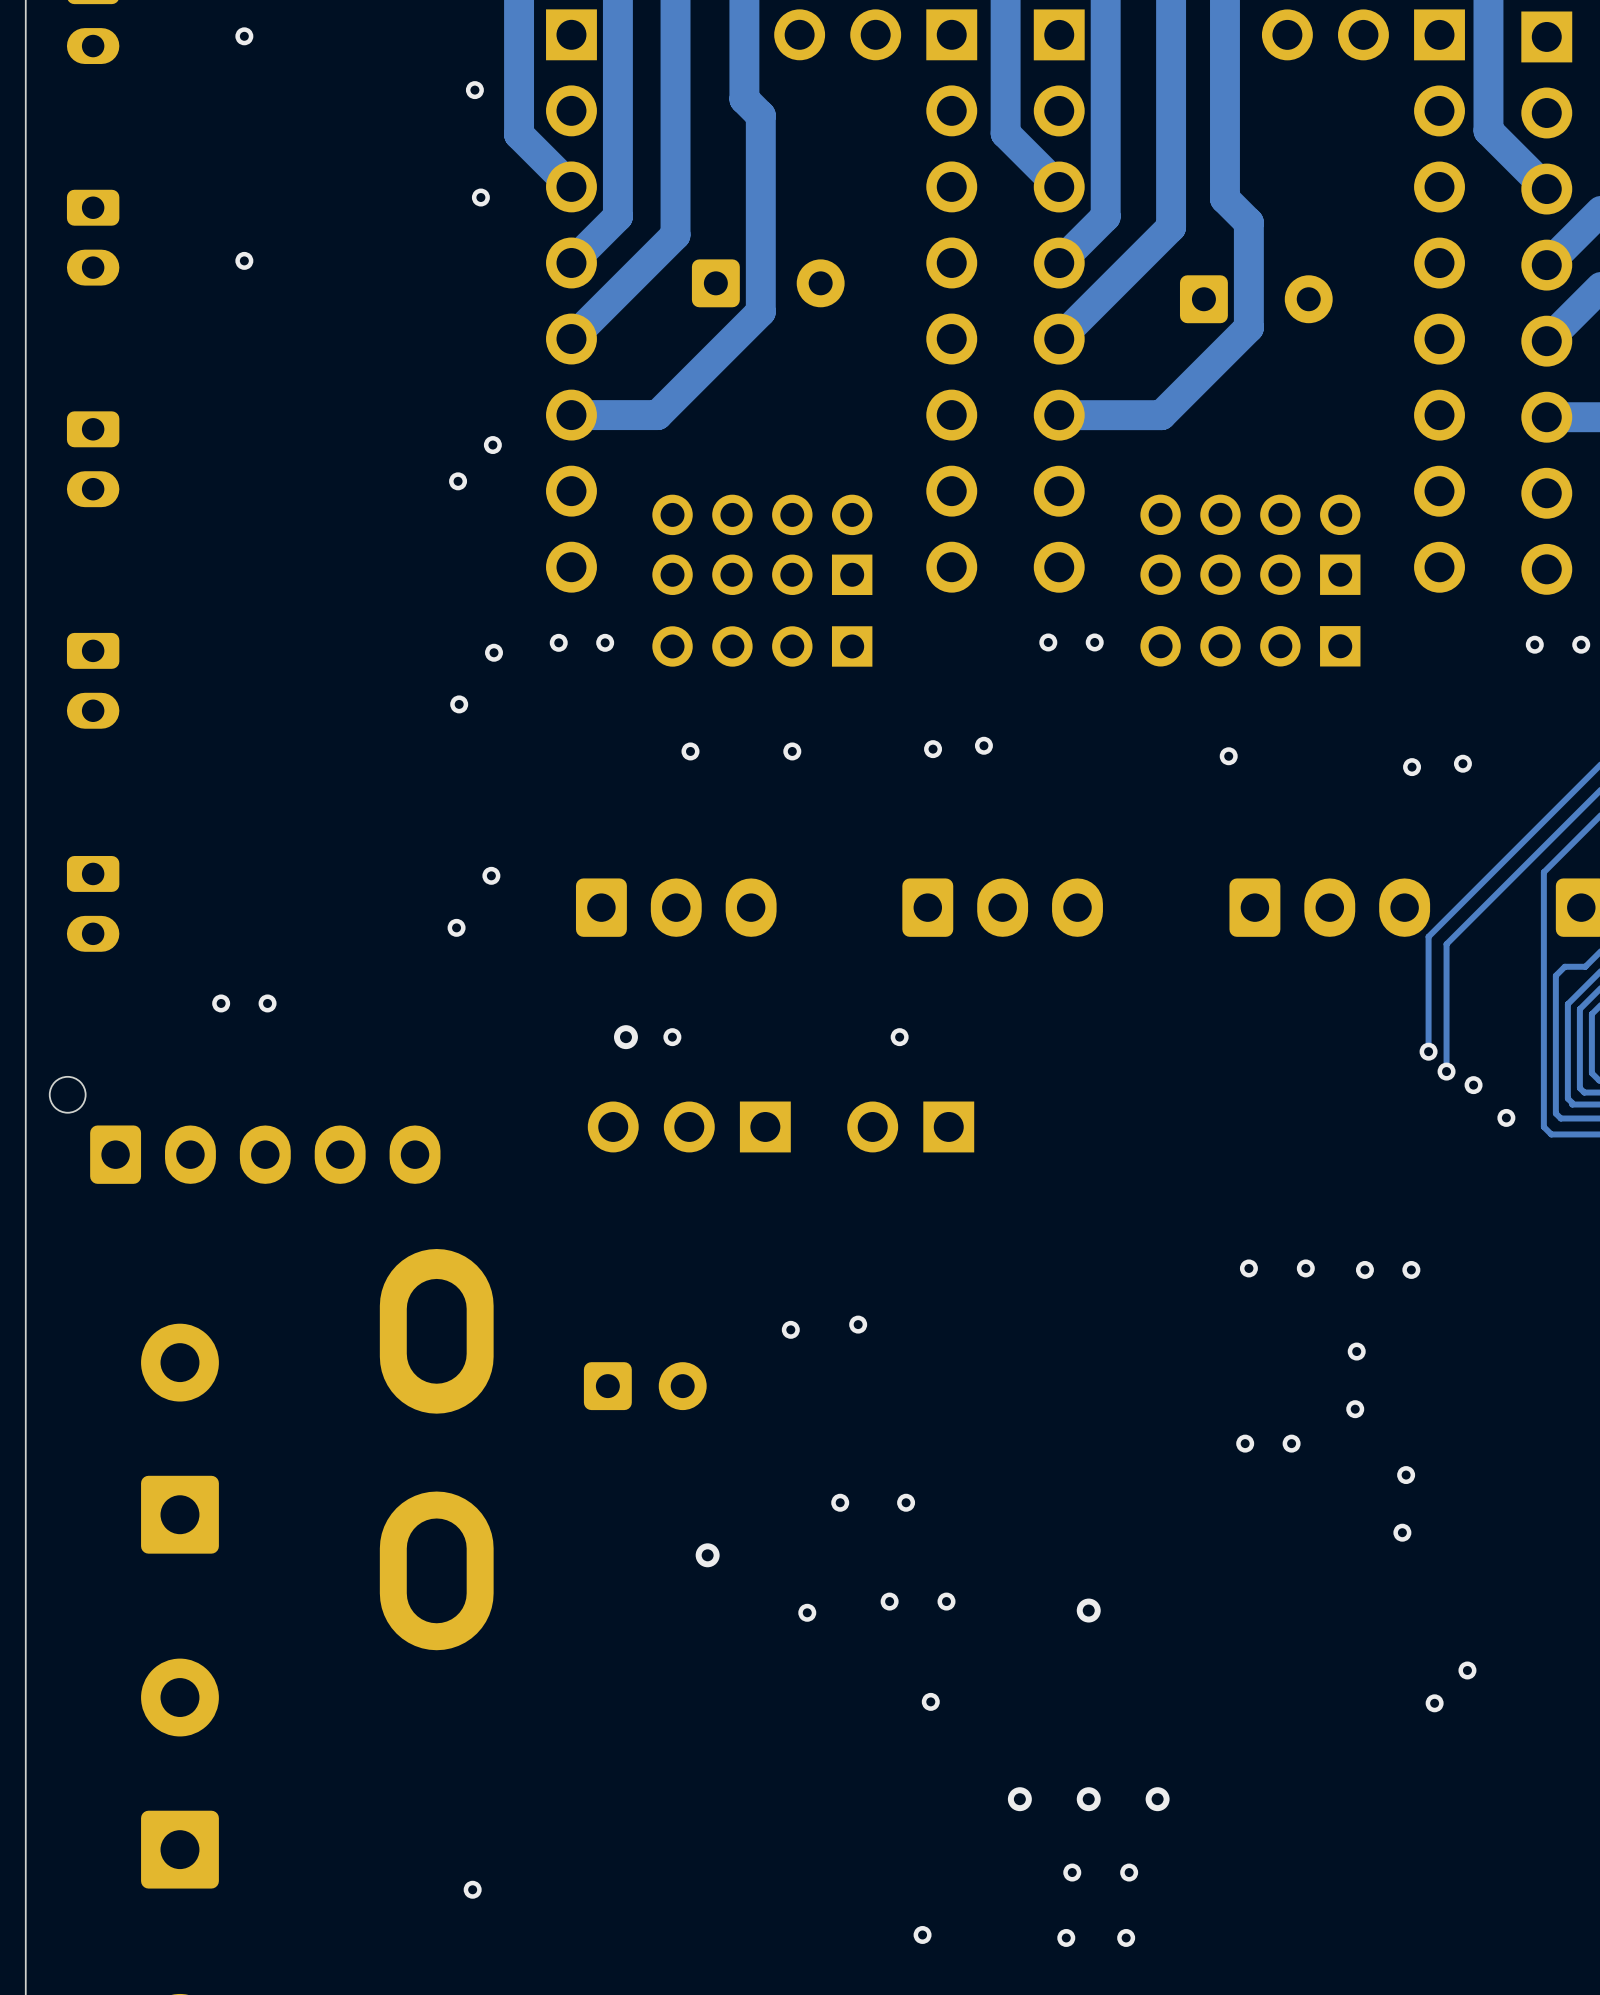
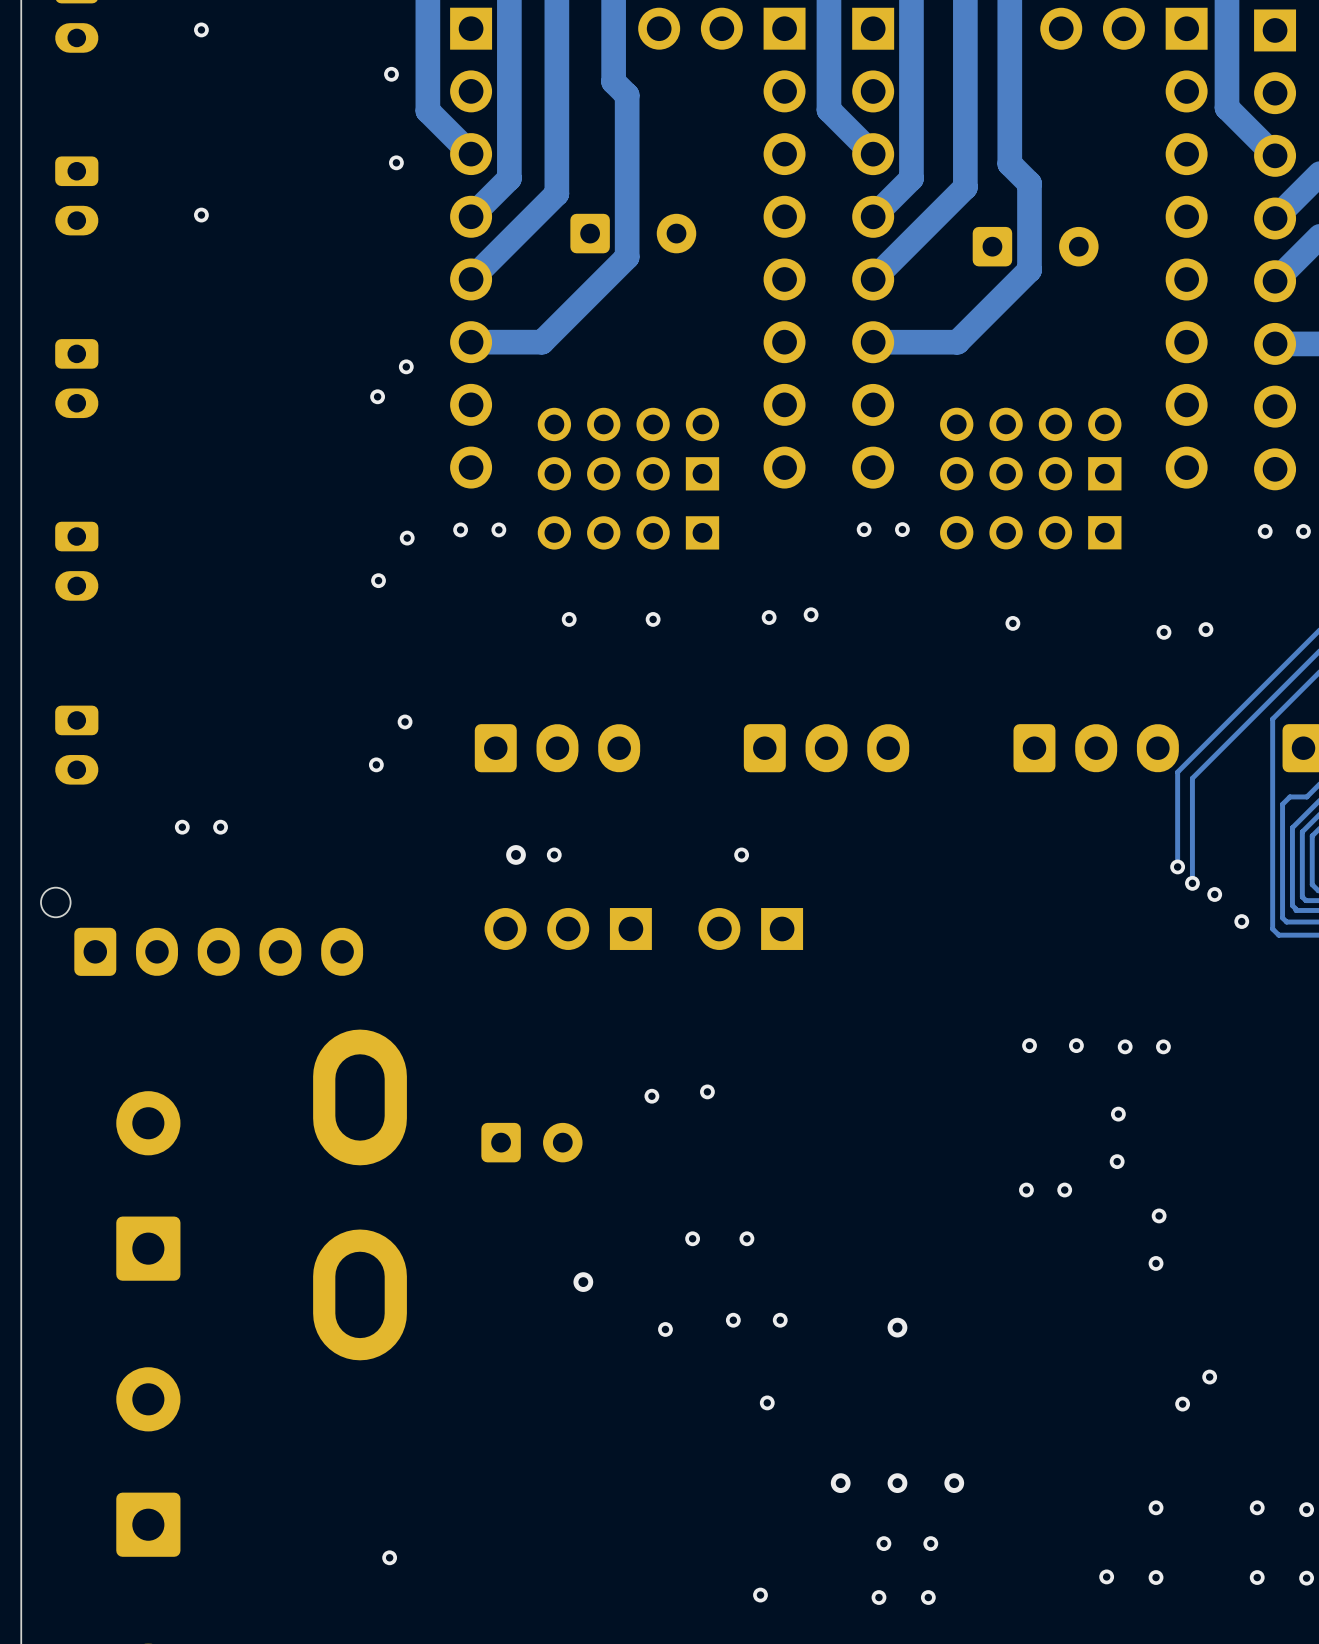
via: none -> (1156, 1507)
via: none -> (1257, 1507)
via: none -> (1306, 1509)
via: none -> (1106, 1576)
via: none -> (1156, 1577)
via: none -> (1257, 1577)
via: none -> (1306, 1578)

